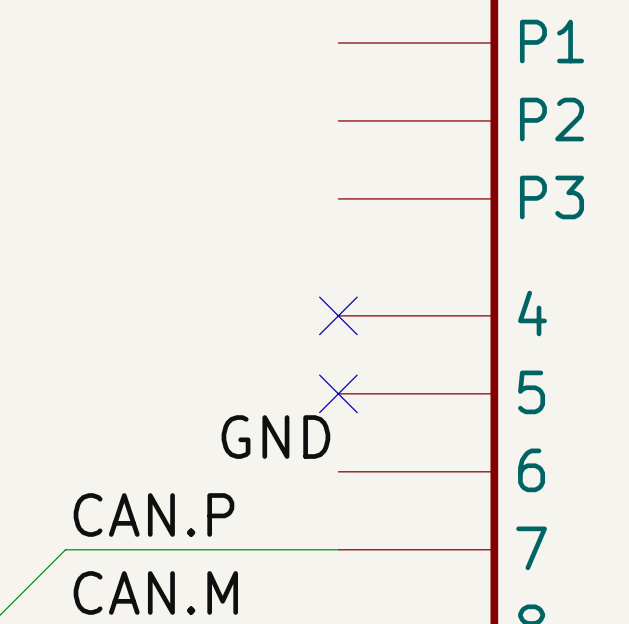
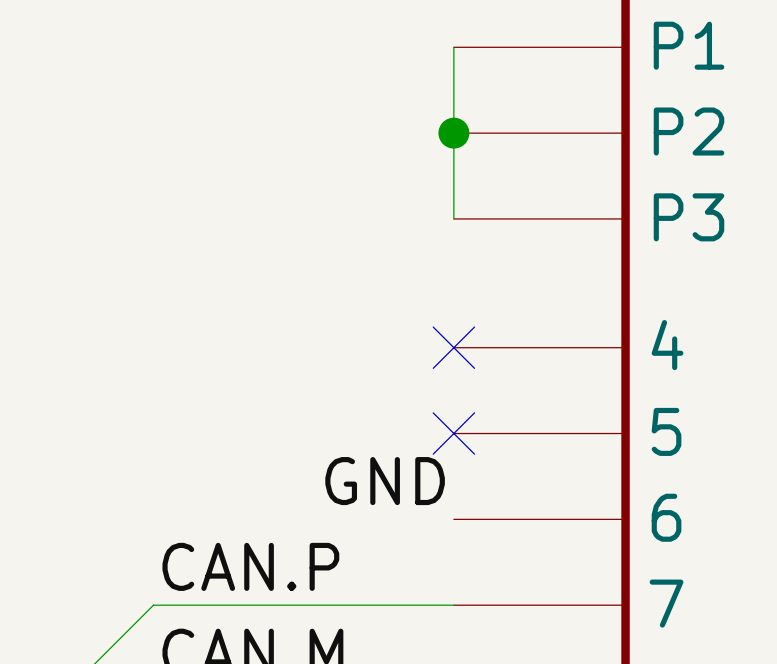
wire: none -> (453, 47) (453, 218)
junction: none -> (453, 133)

